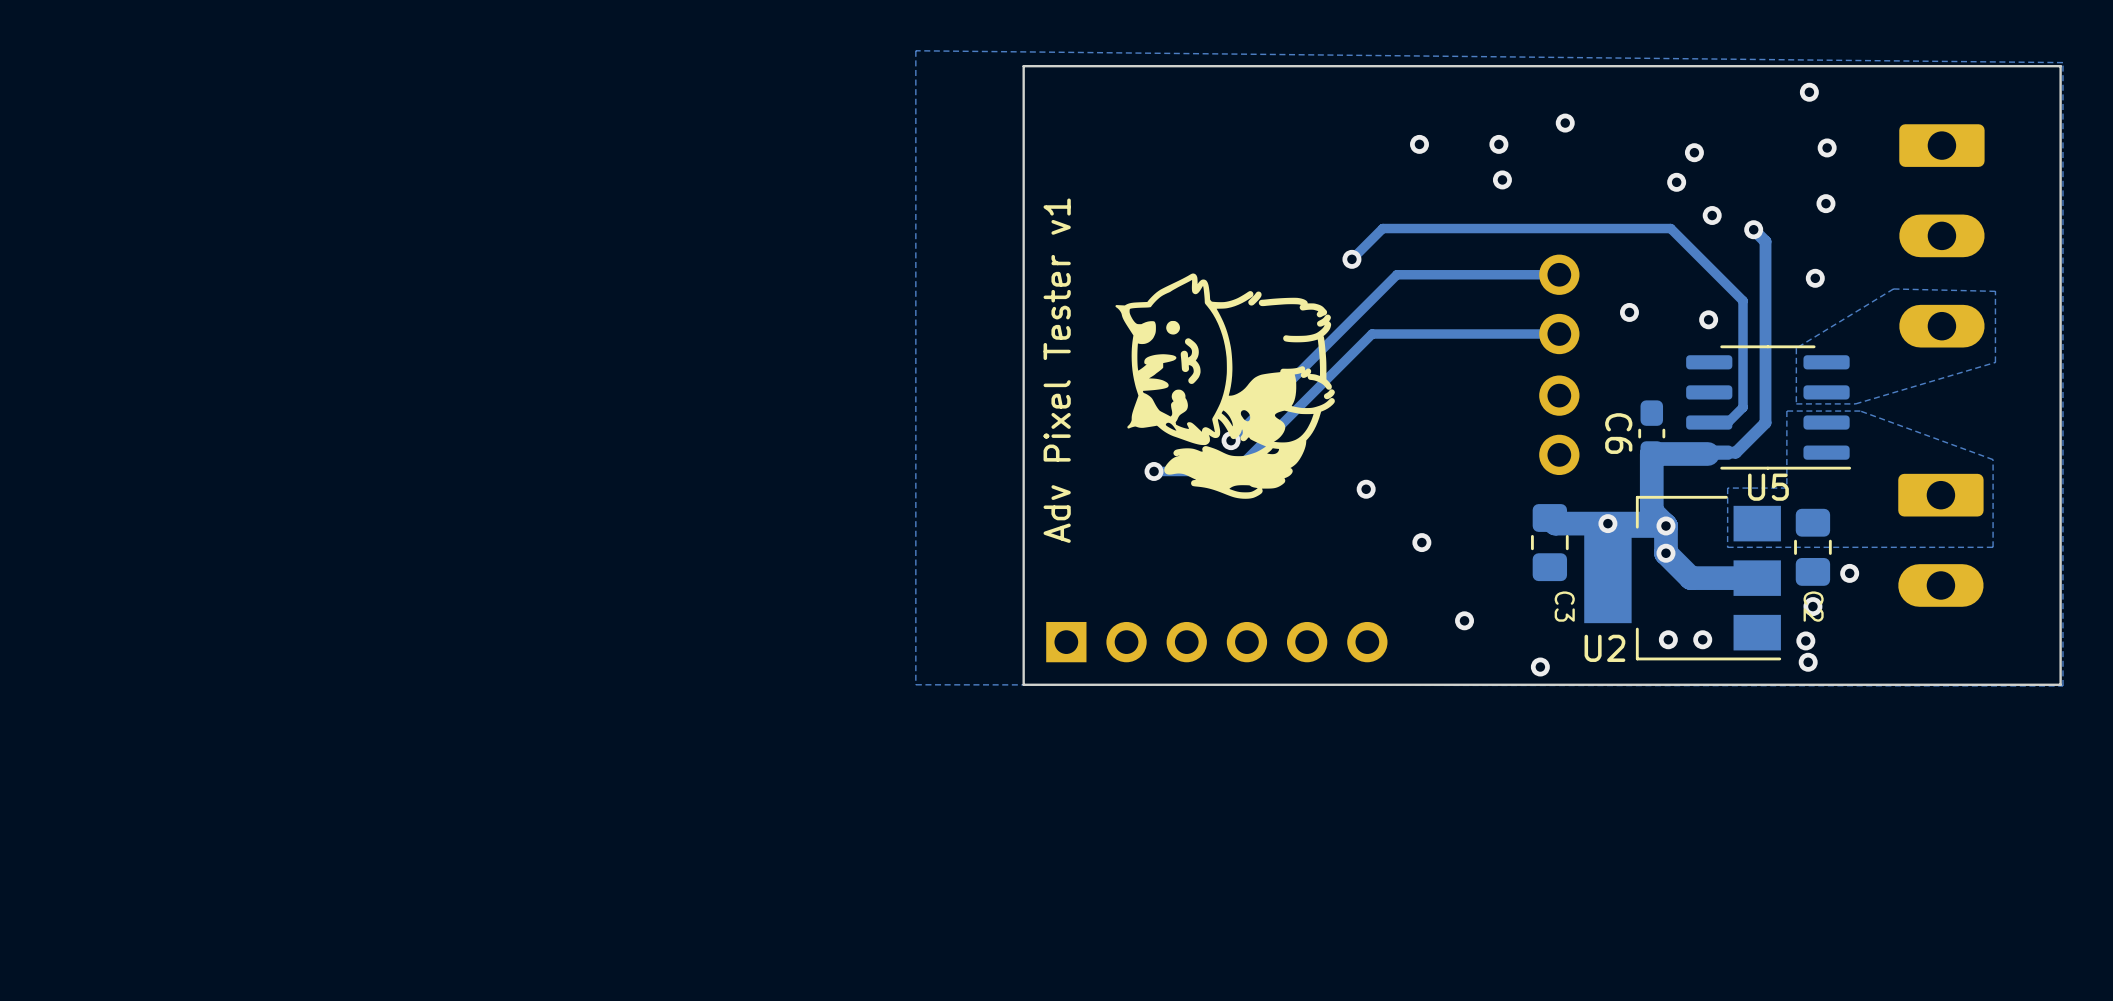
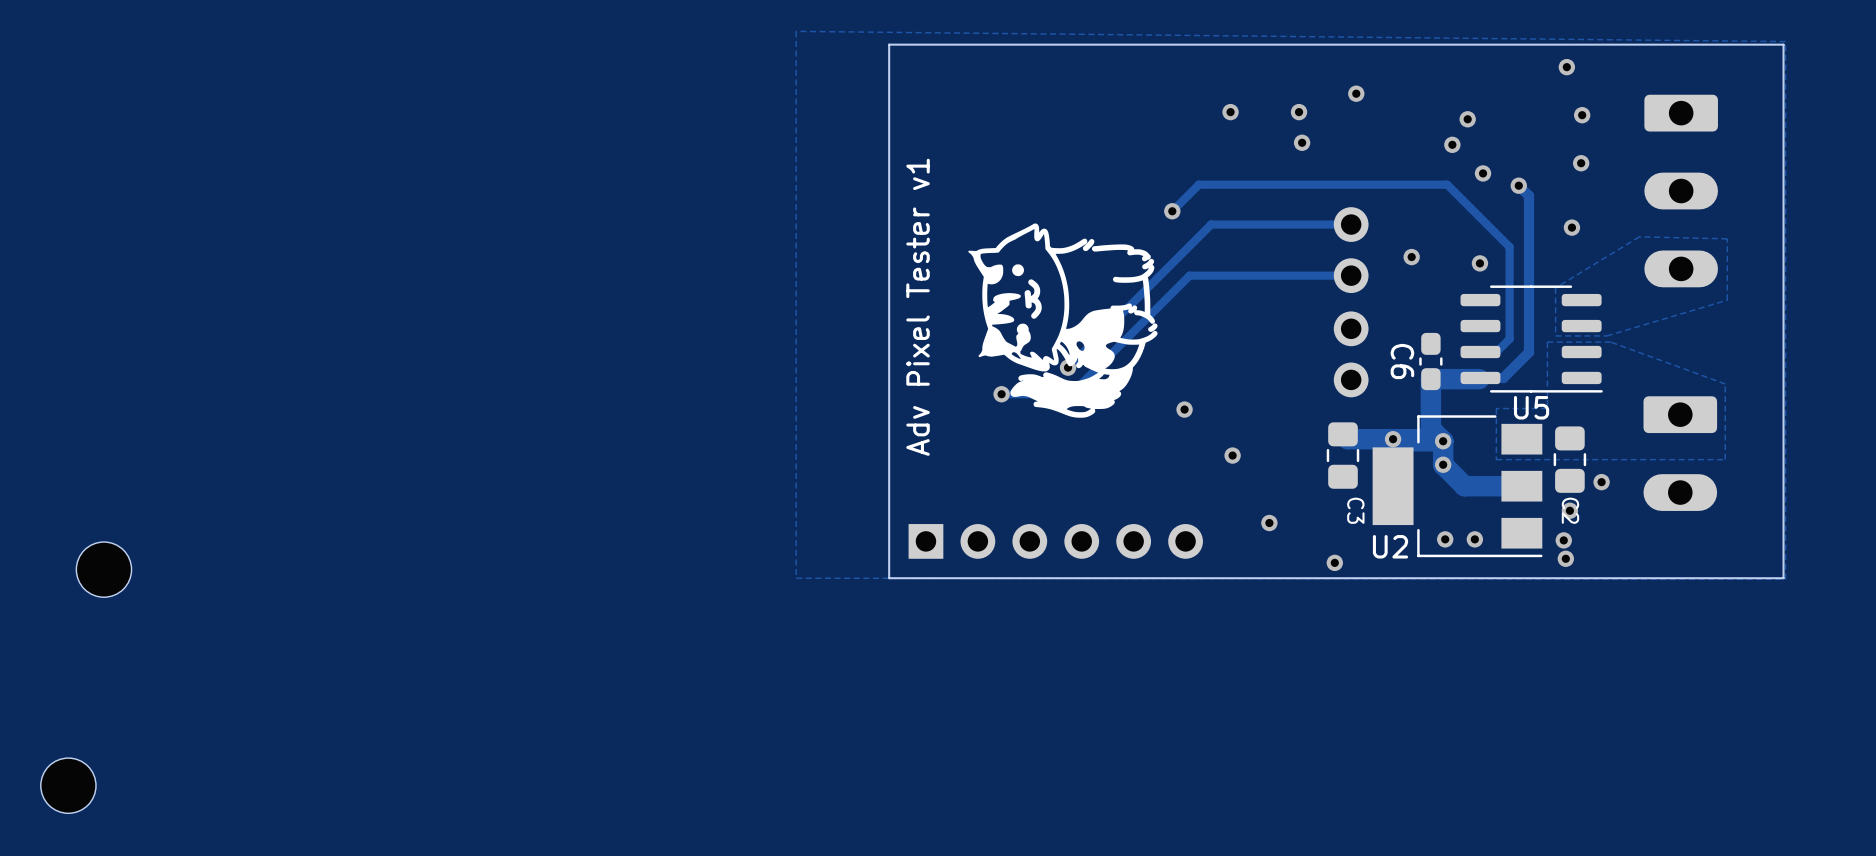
part: none -> (103, 569)
part: none -> (68, 785)

